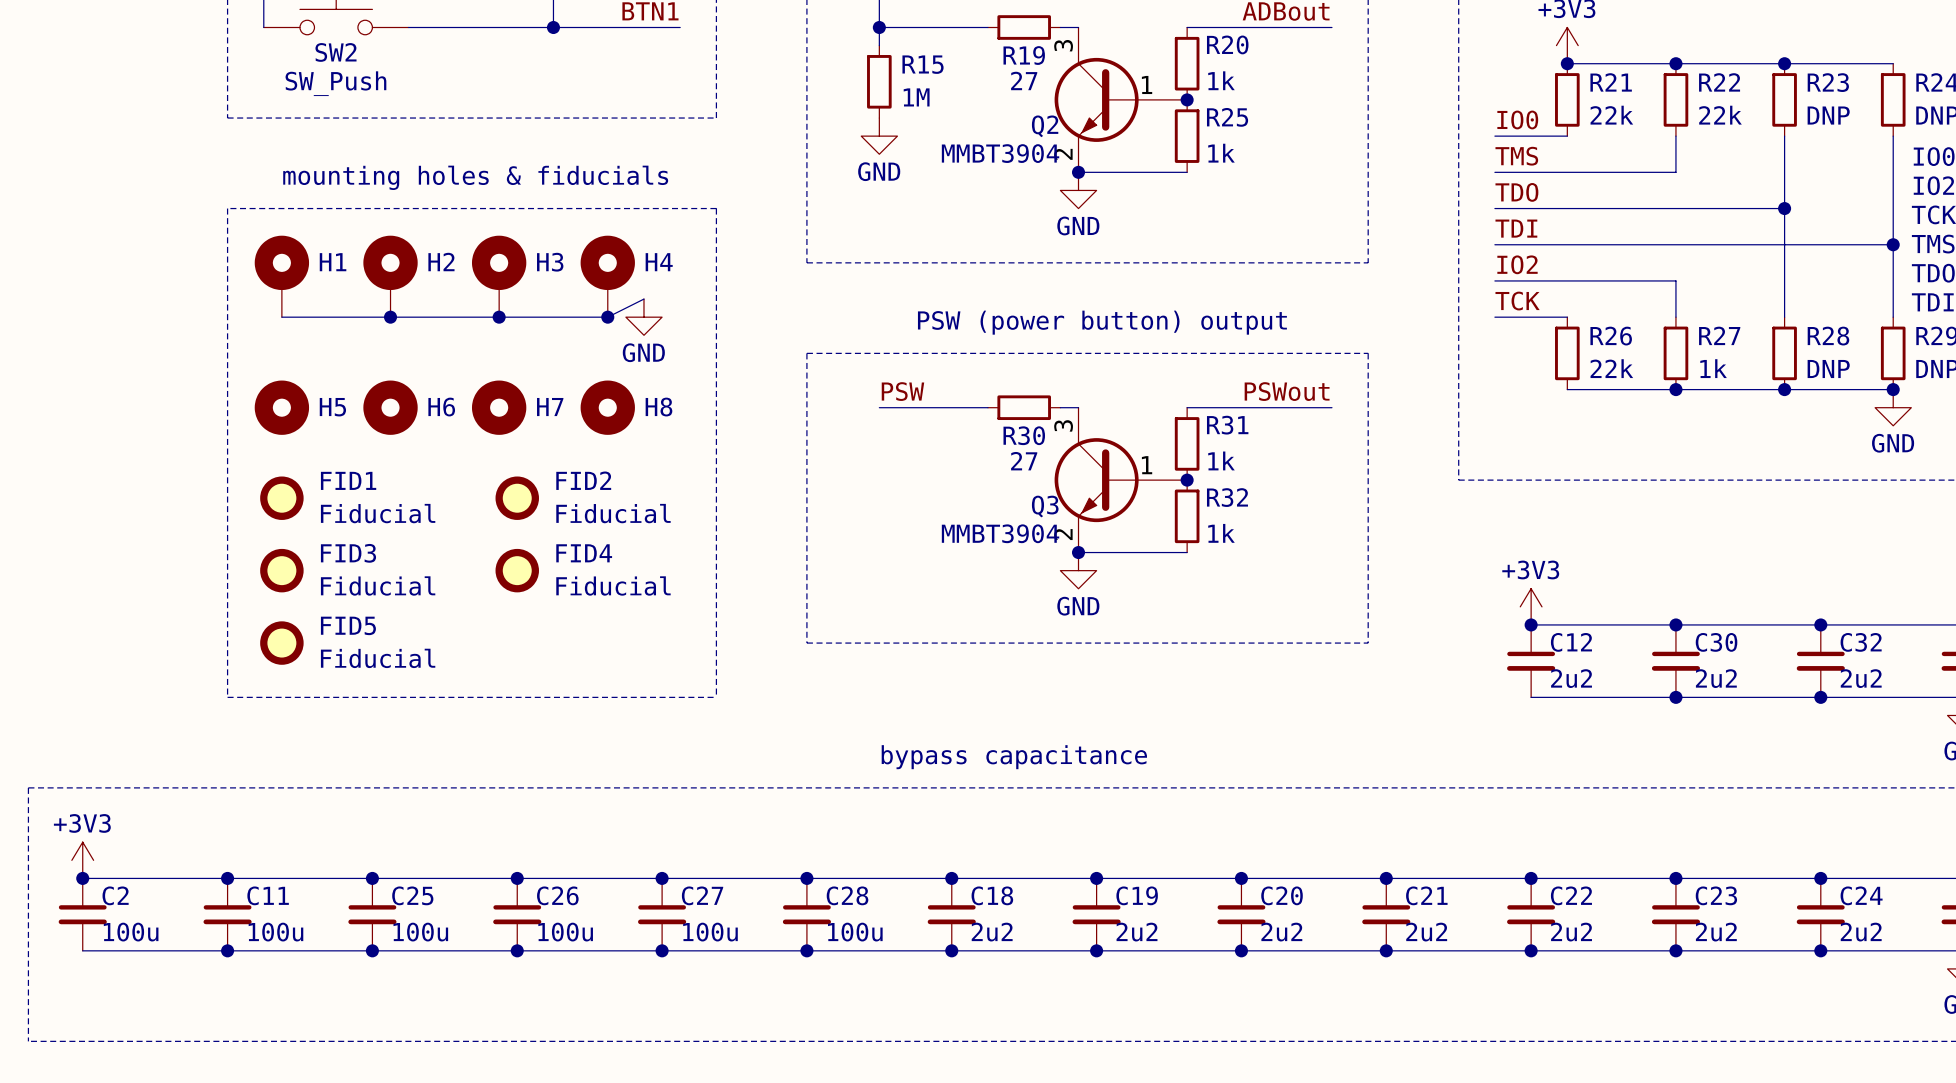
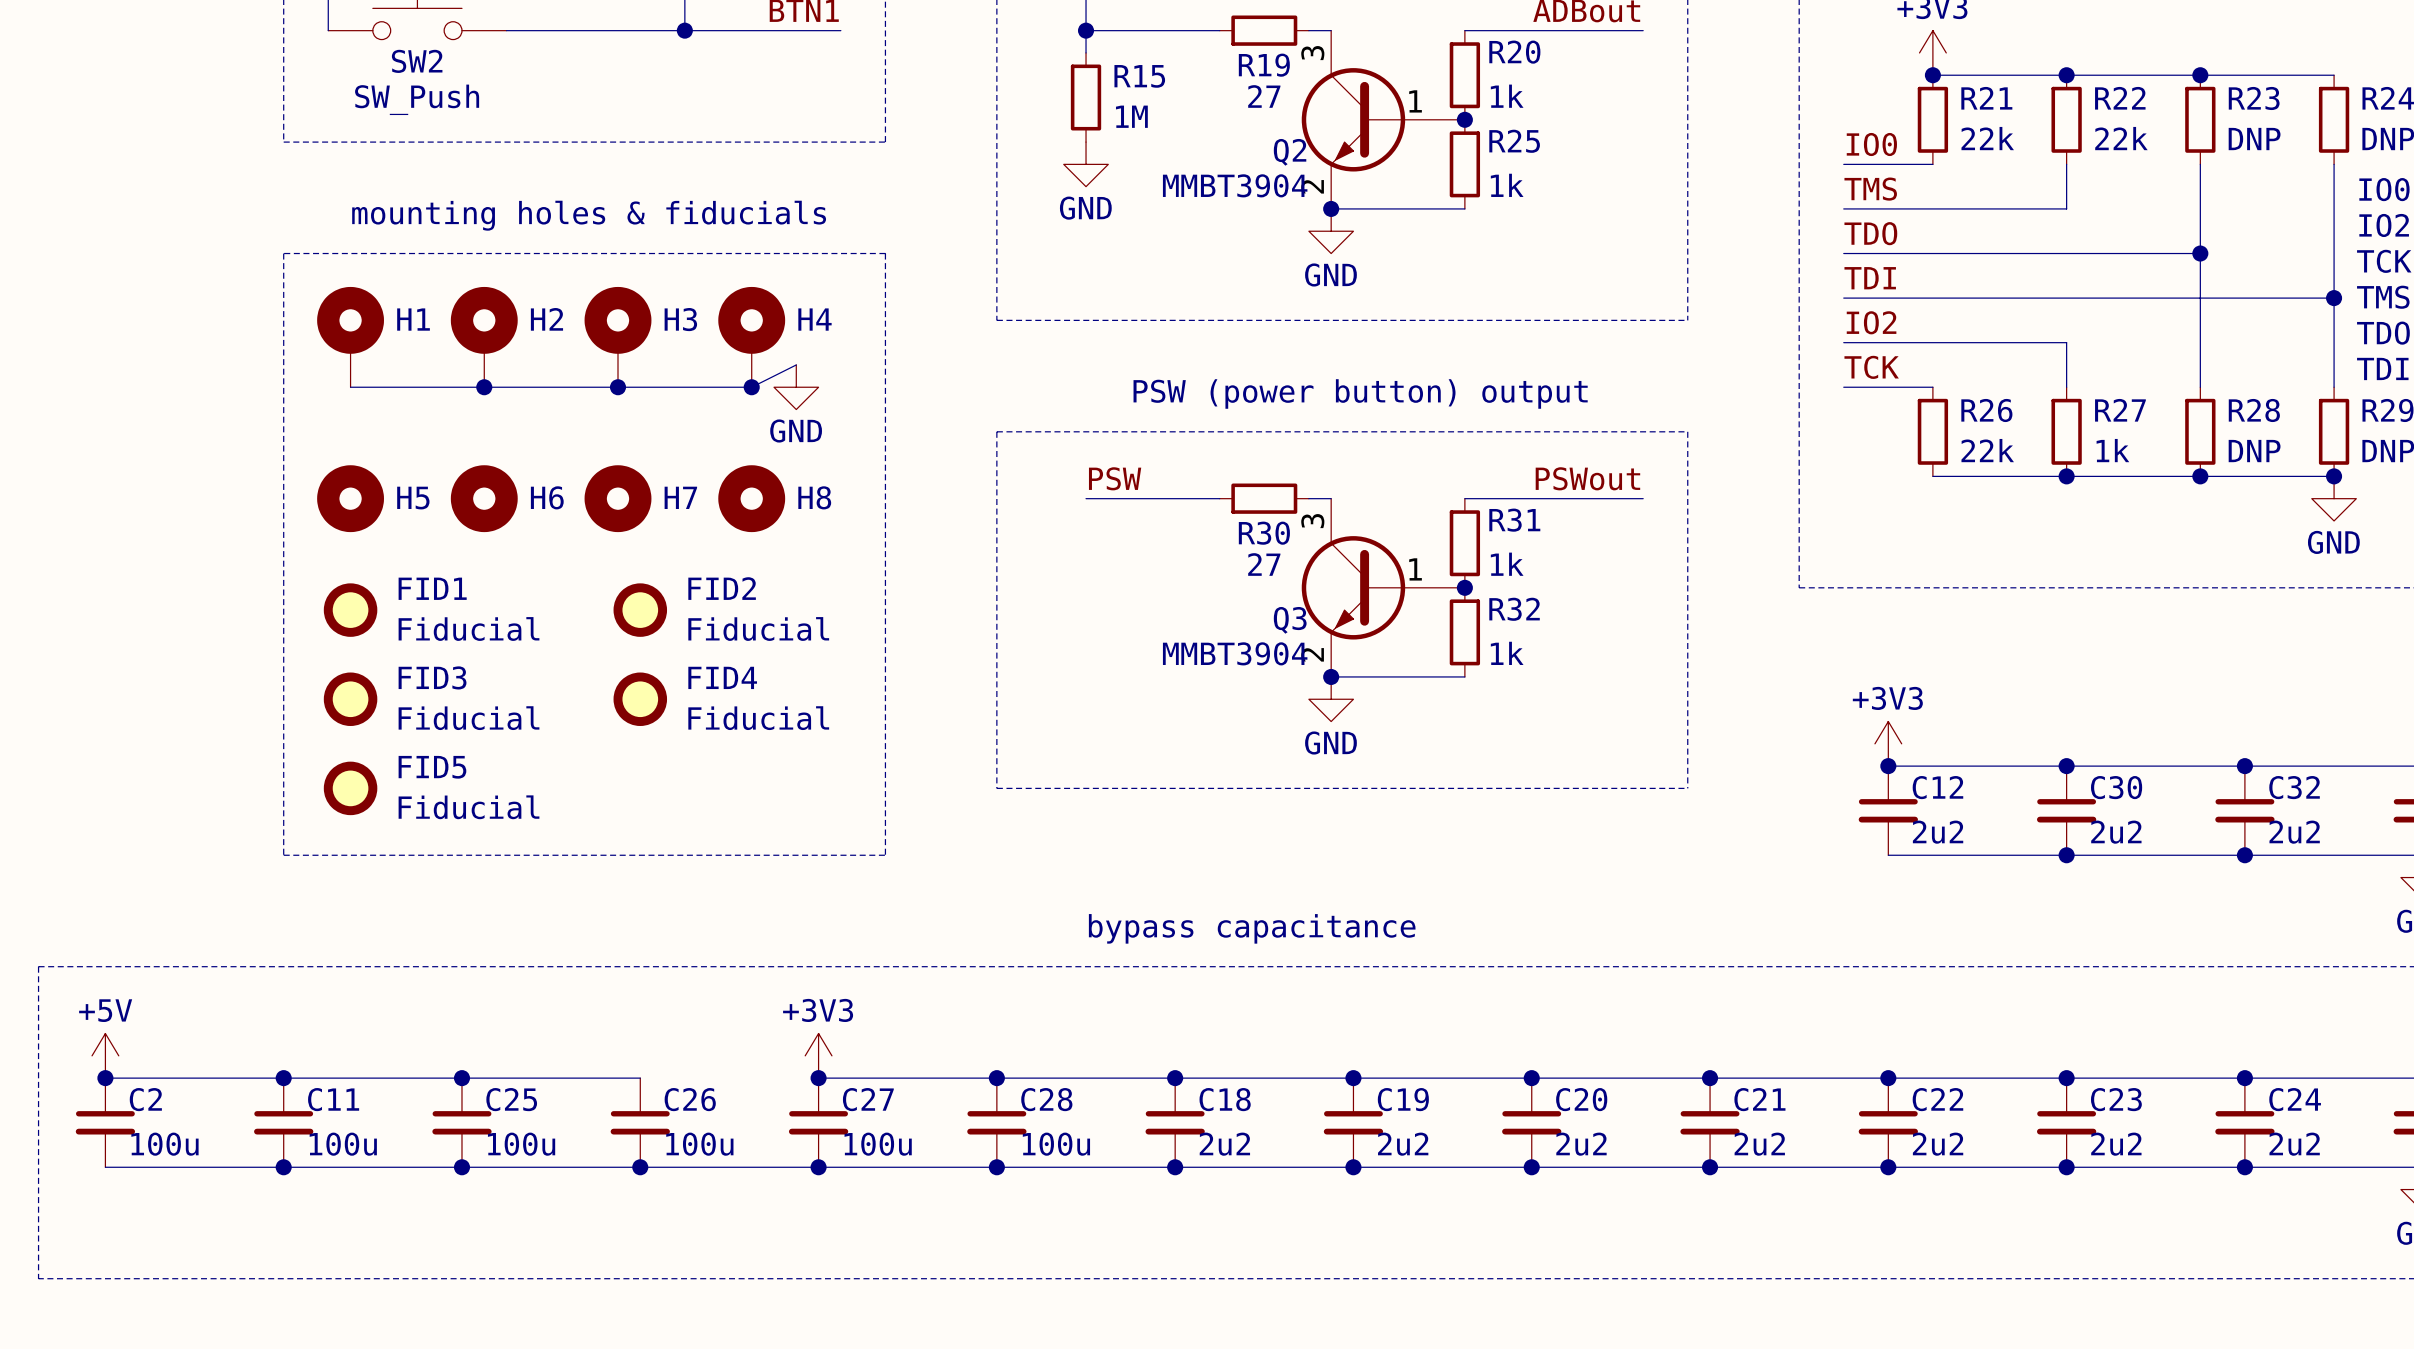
power symbol: +3V3 (82, 860) -> +5V (105, 1055)
power symbol: none -> +3V3 (818, 1055)
wire: (517, 878) (662, 878) -> none
junction: (517, 878) -> none

